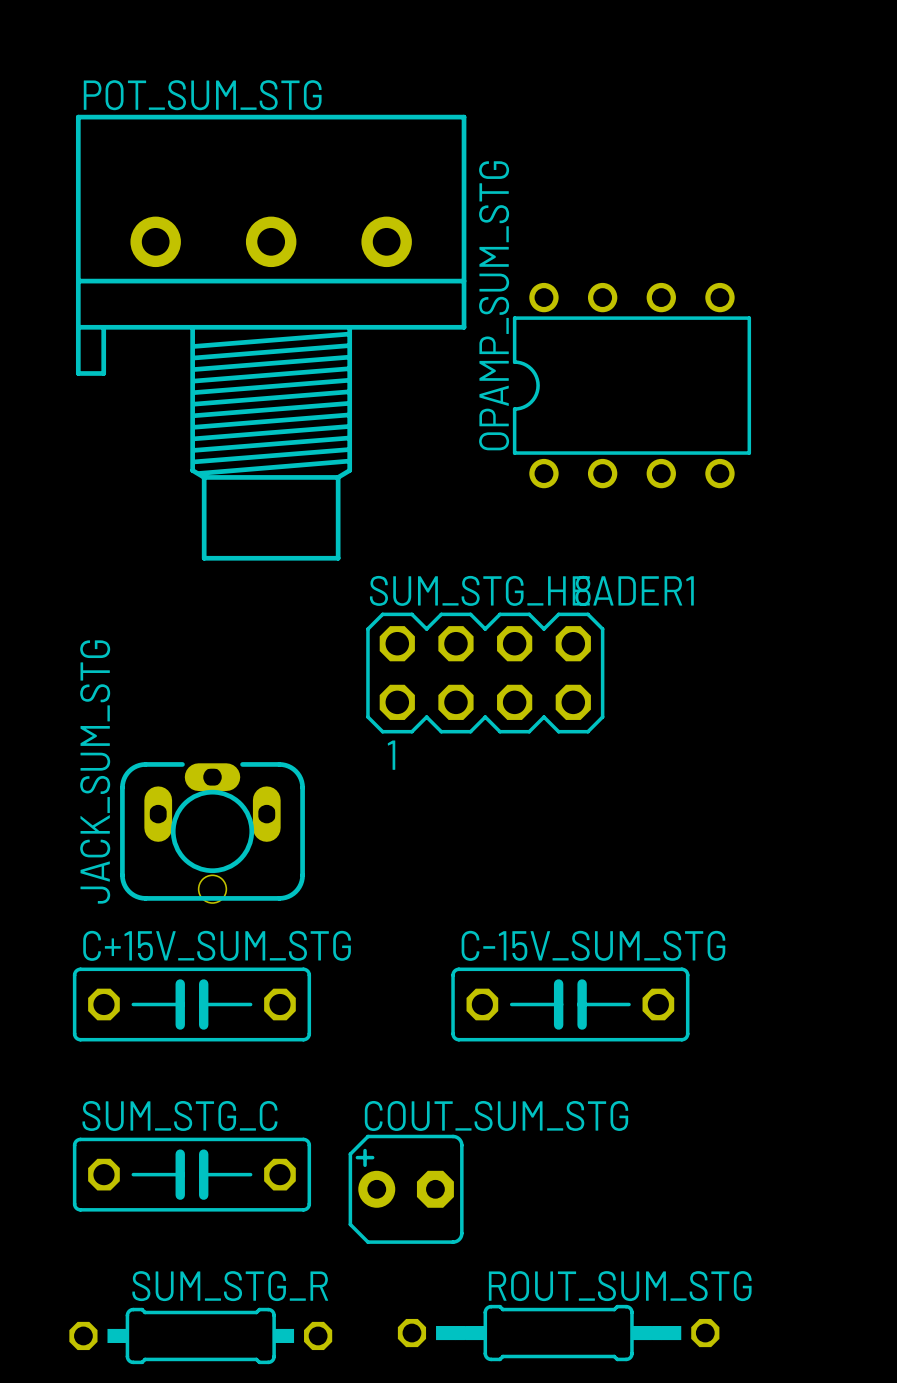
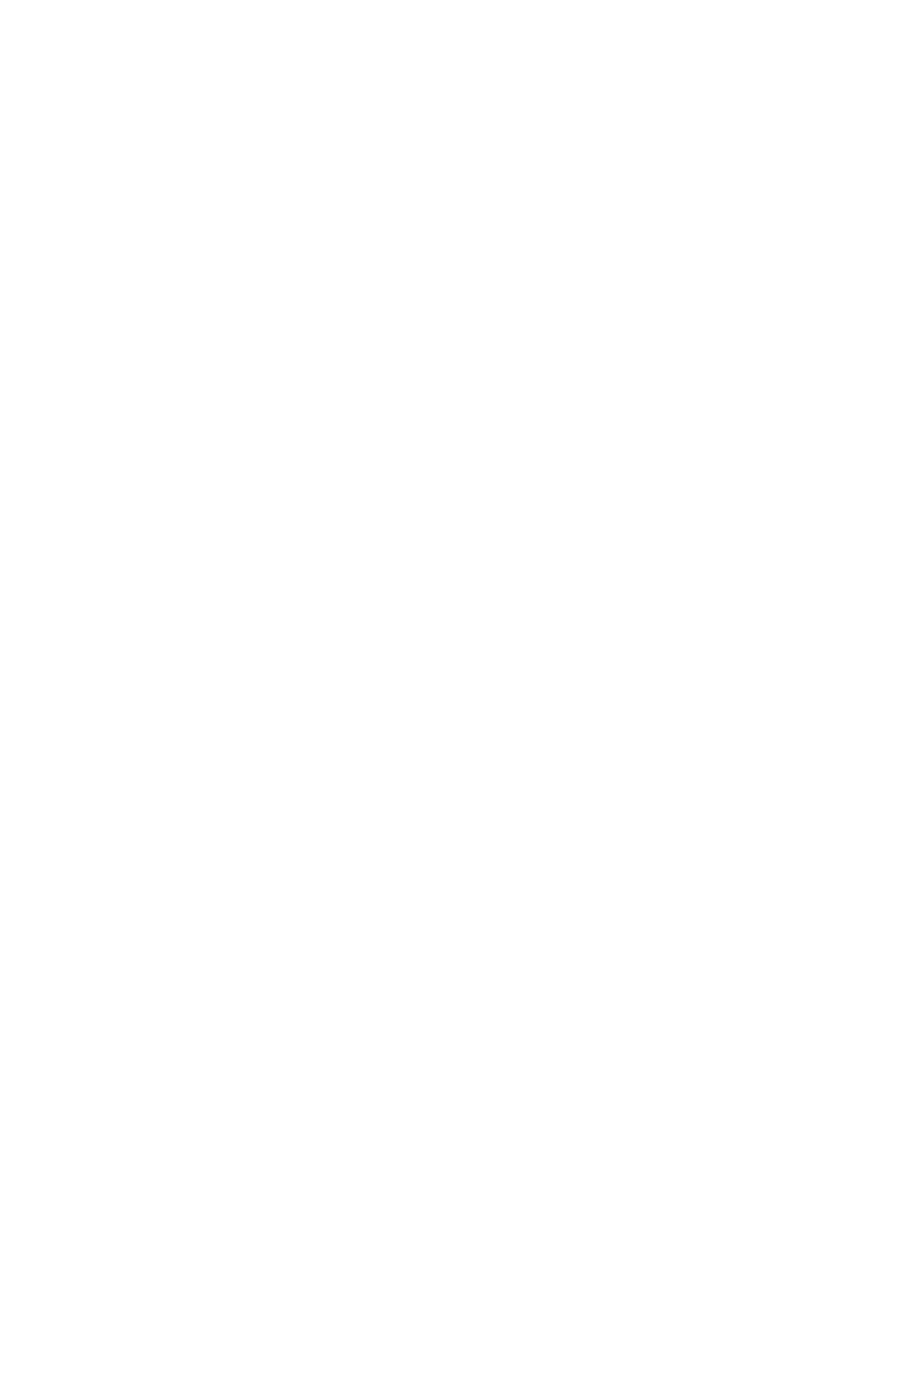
POT_SUM_STG: (271, 337) -> none
OPAMP_SUM_STG: (631, 385) -> none
SUM_STG_HEADER1: (485, 673) -> none
JACK_SUM_STG: (212, 832) -> none
C+15V_SUM_STG: (191, 1004) -> none
C-15V_SUM_STG: (570, 1004) -> none
SUM_STG_C: (191, 1174) -> none
COUT_SUM_STG: (406, 1189) -> none
ROUT_SUM_STG: (558, 1333) -> none
SUM_STG_R: (200, 1335) -> none

